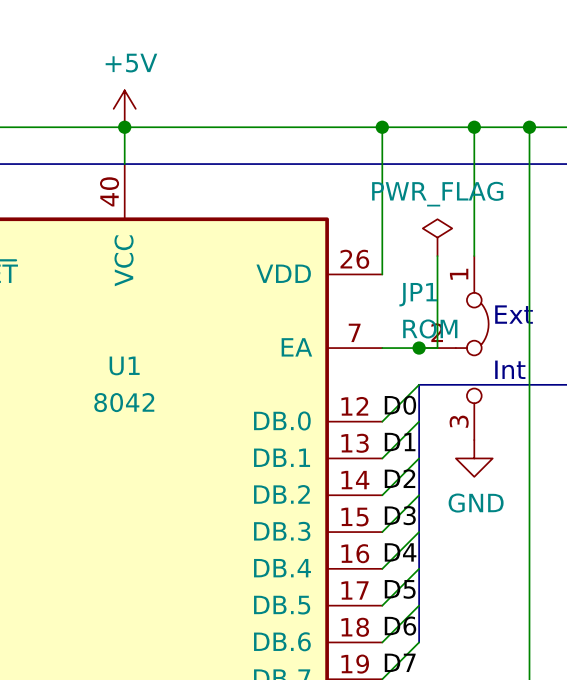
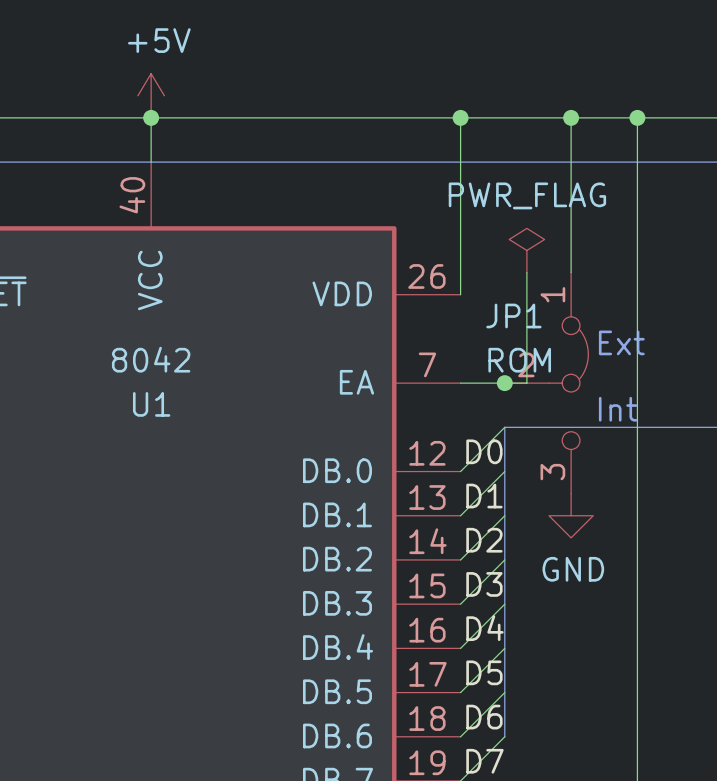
U1 value position: 8042 (124, 402) -> 8042 (151, 359)

